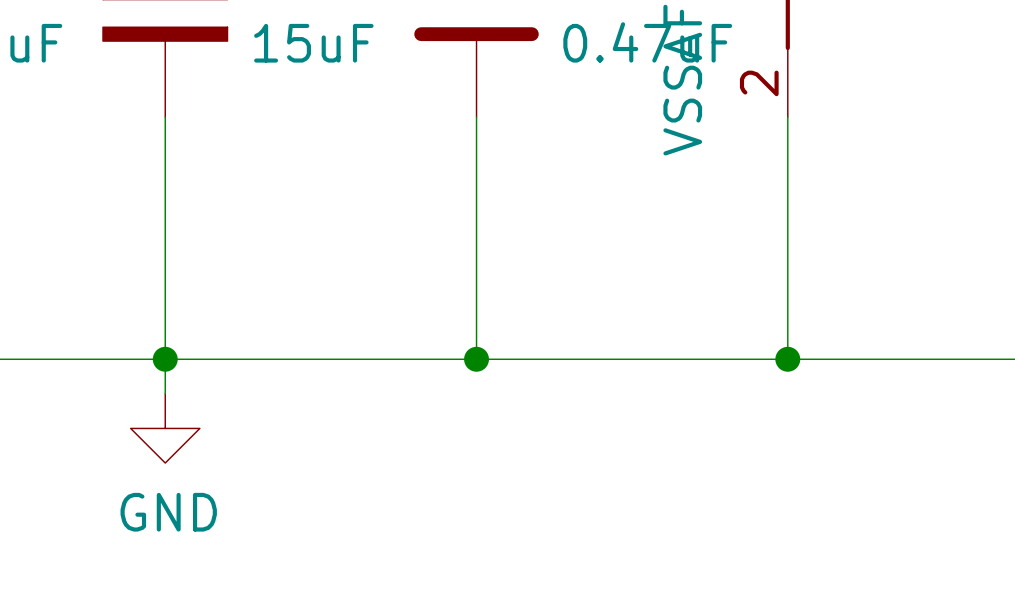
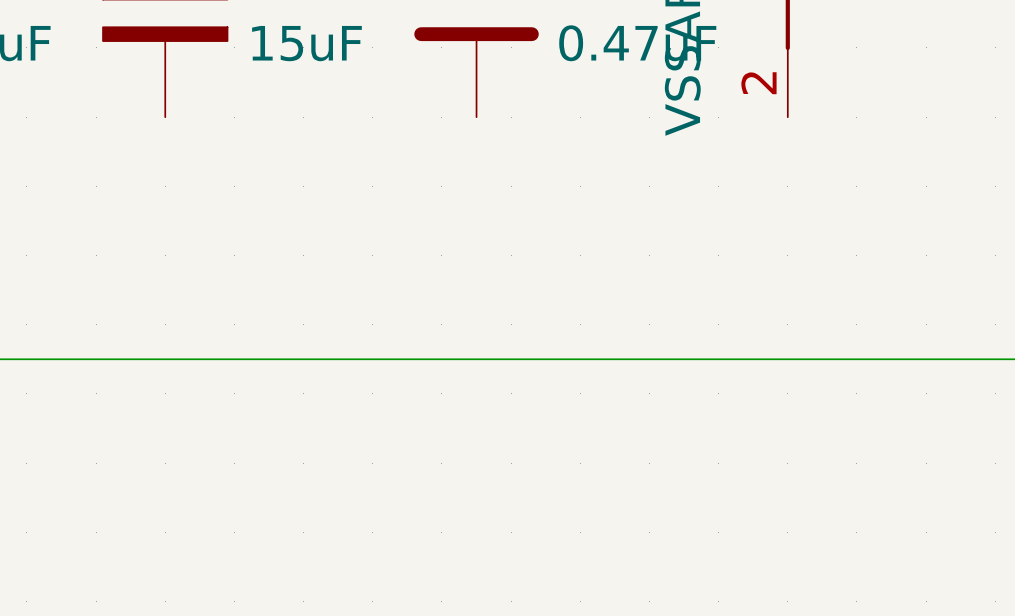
wire: (165, 117) (165, 393) -> none
wire: (476, 117) (476, 359) -> none
wire: (787, 117) (787, 359) -> none
junction: (165, 359) -> none
junction: (476, 359) -> none
junction: (787, 359) -> none
power symbol: GND (165, 428) -> none

